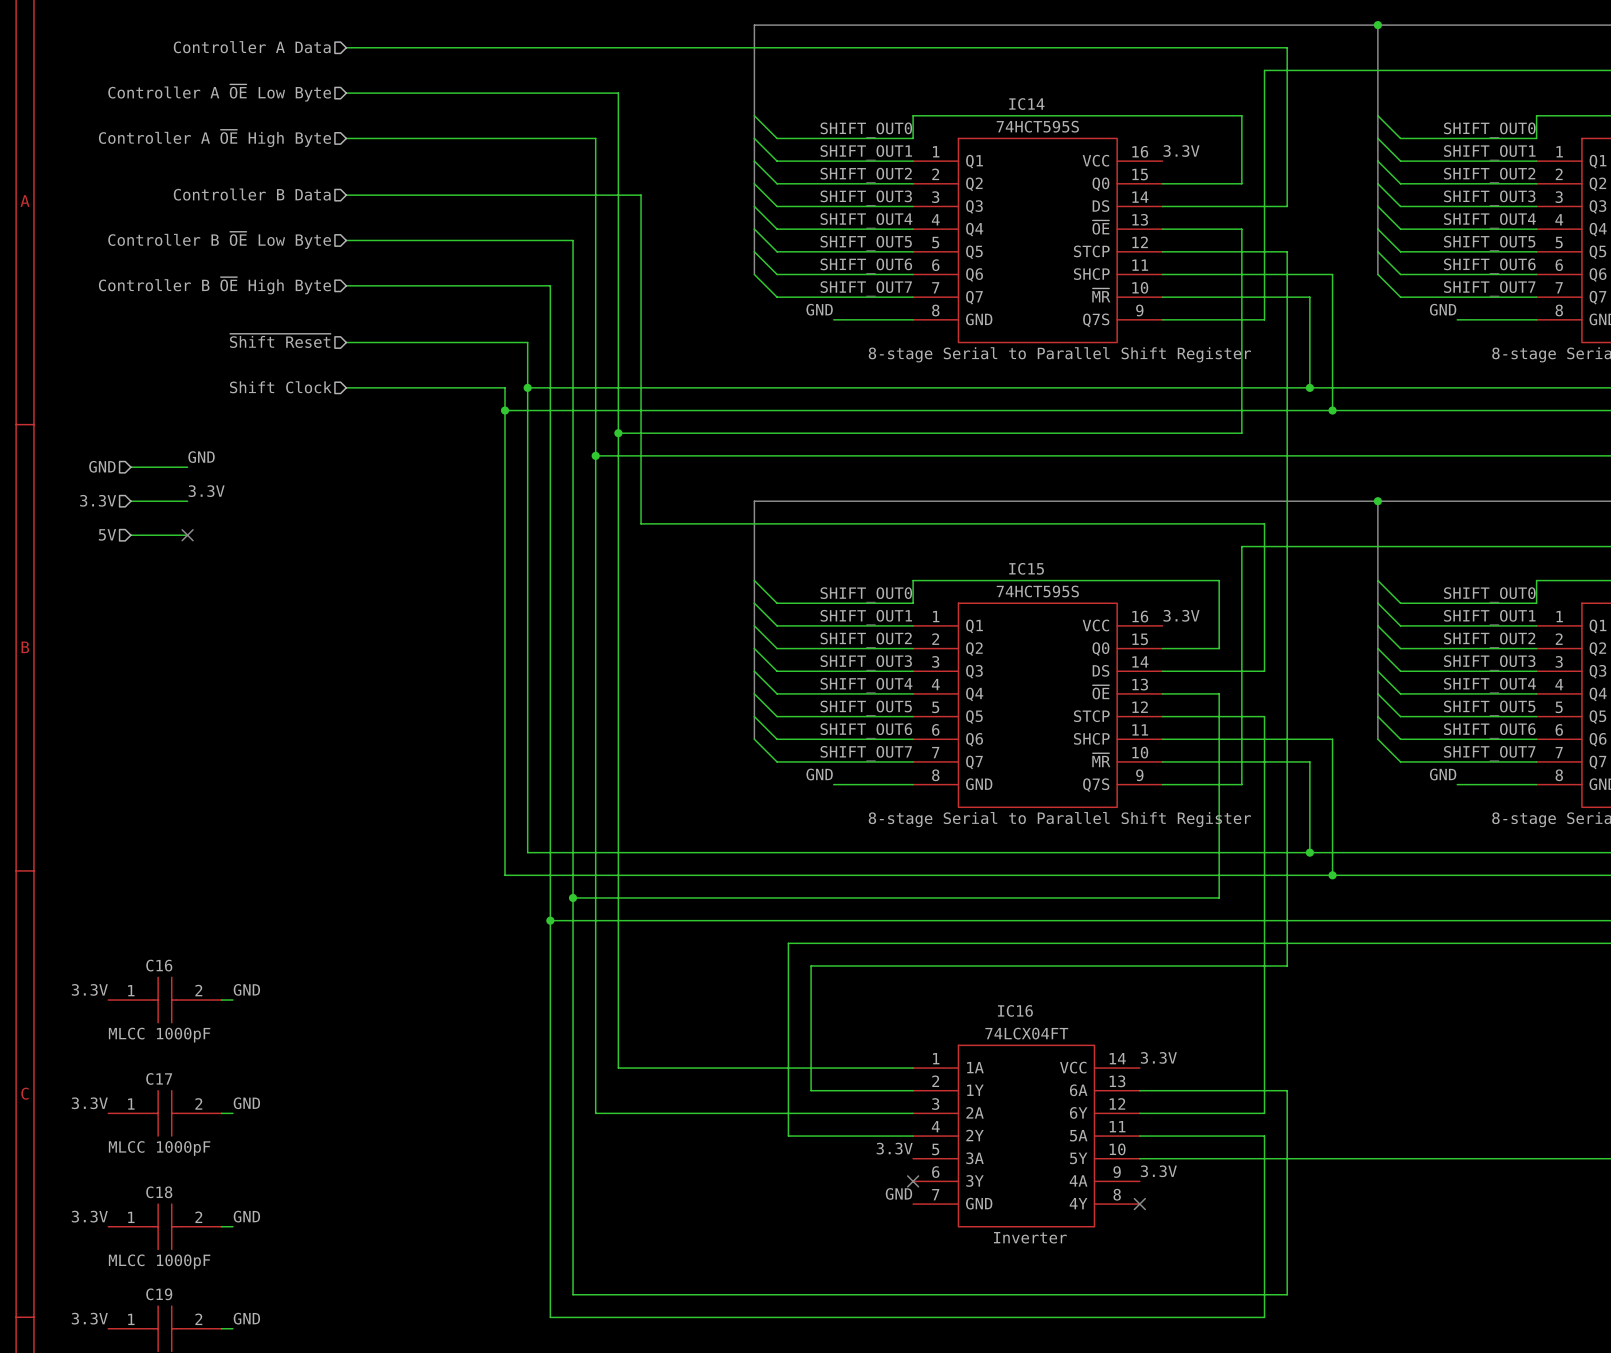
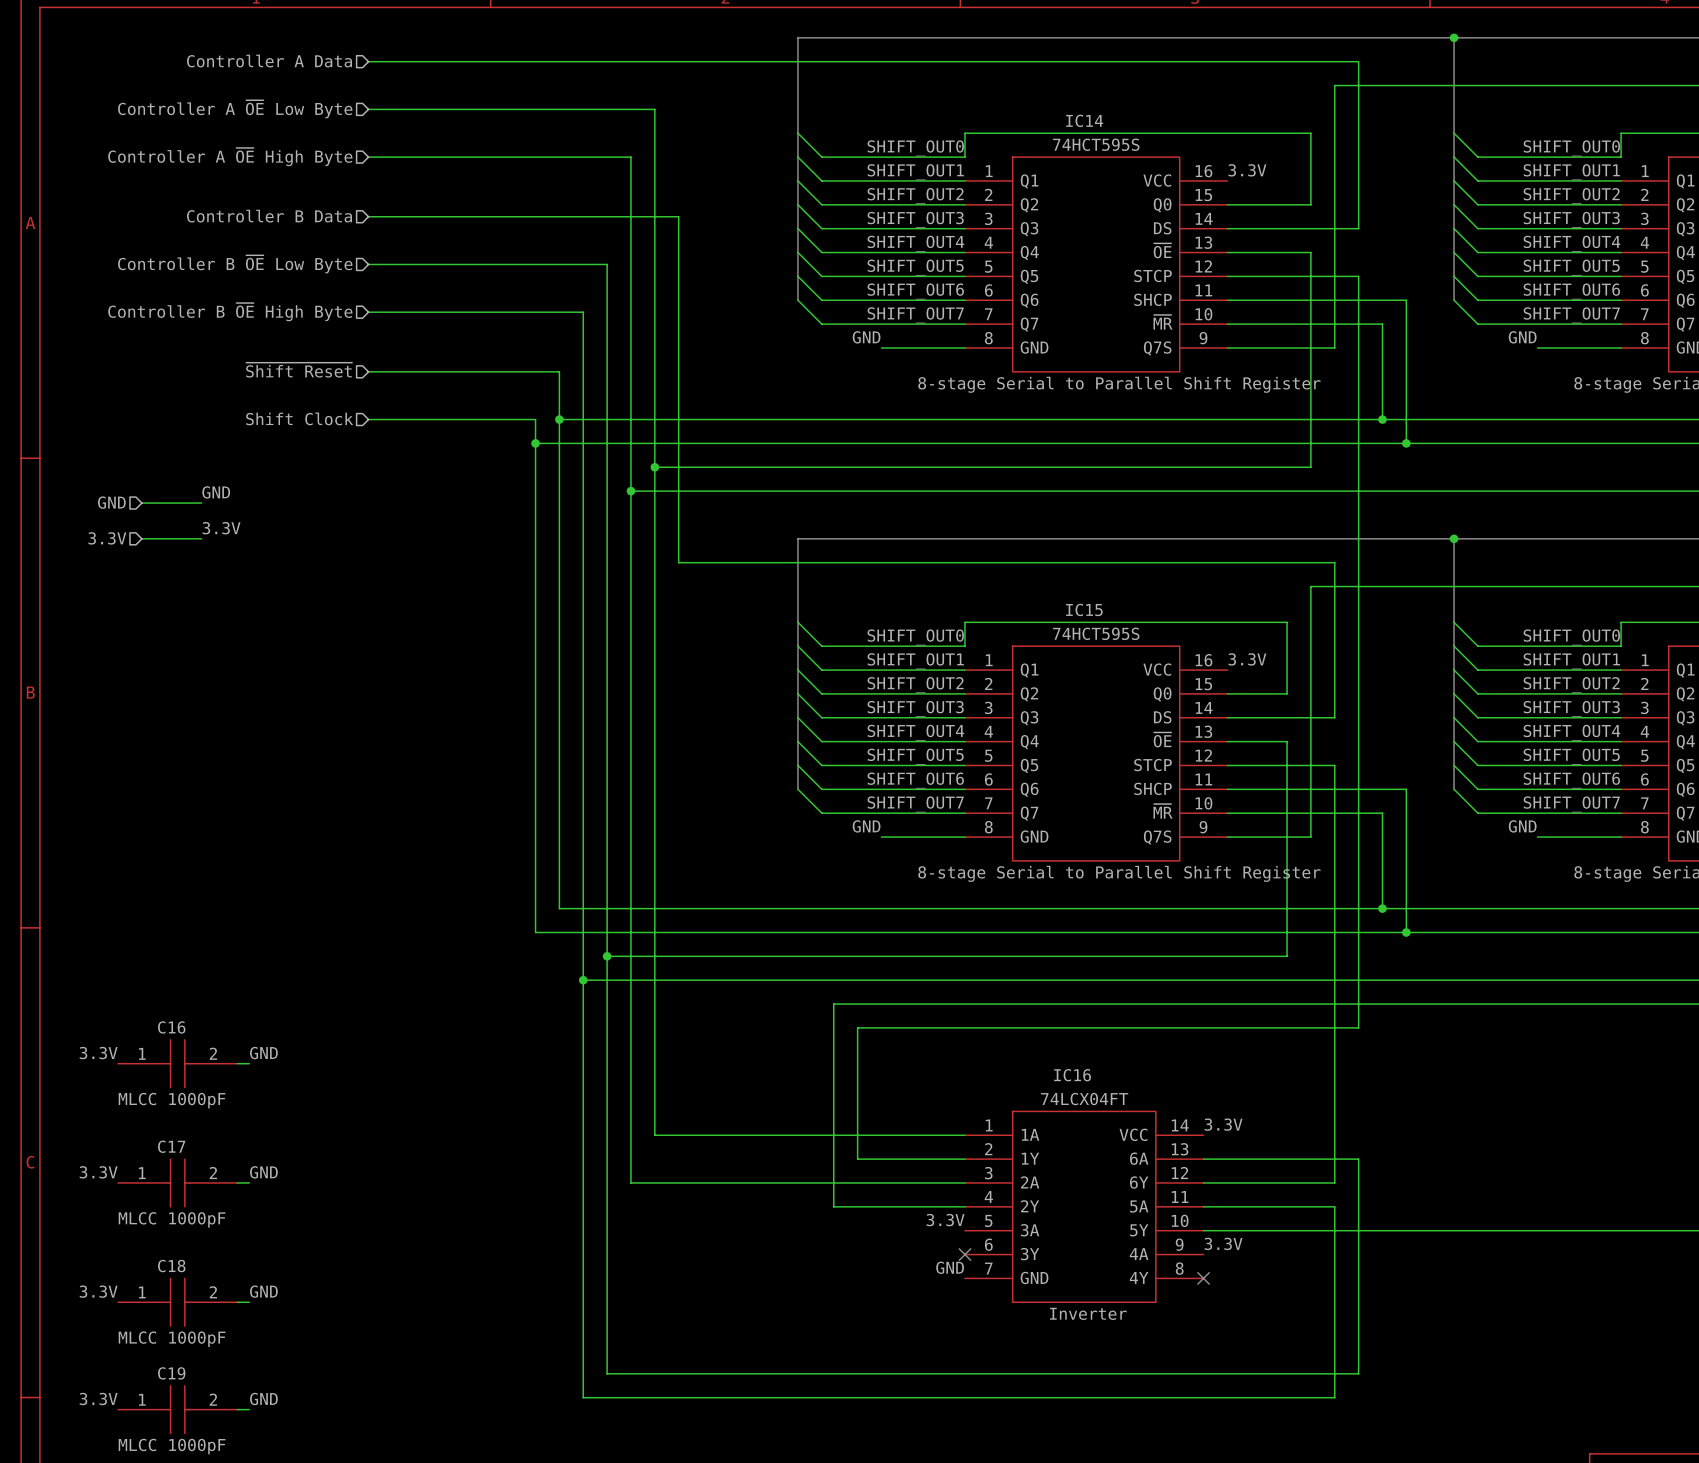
hierarchical label: 5V (107, 534) -> none
wire: (130, 535) (187, 535) -> none
no-connect mark: (187, 535) -> none

